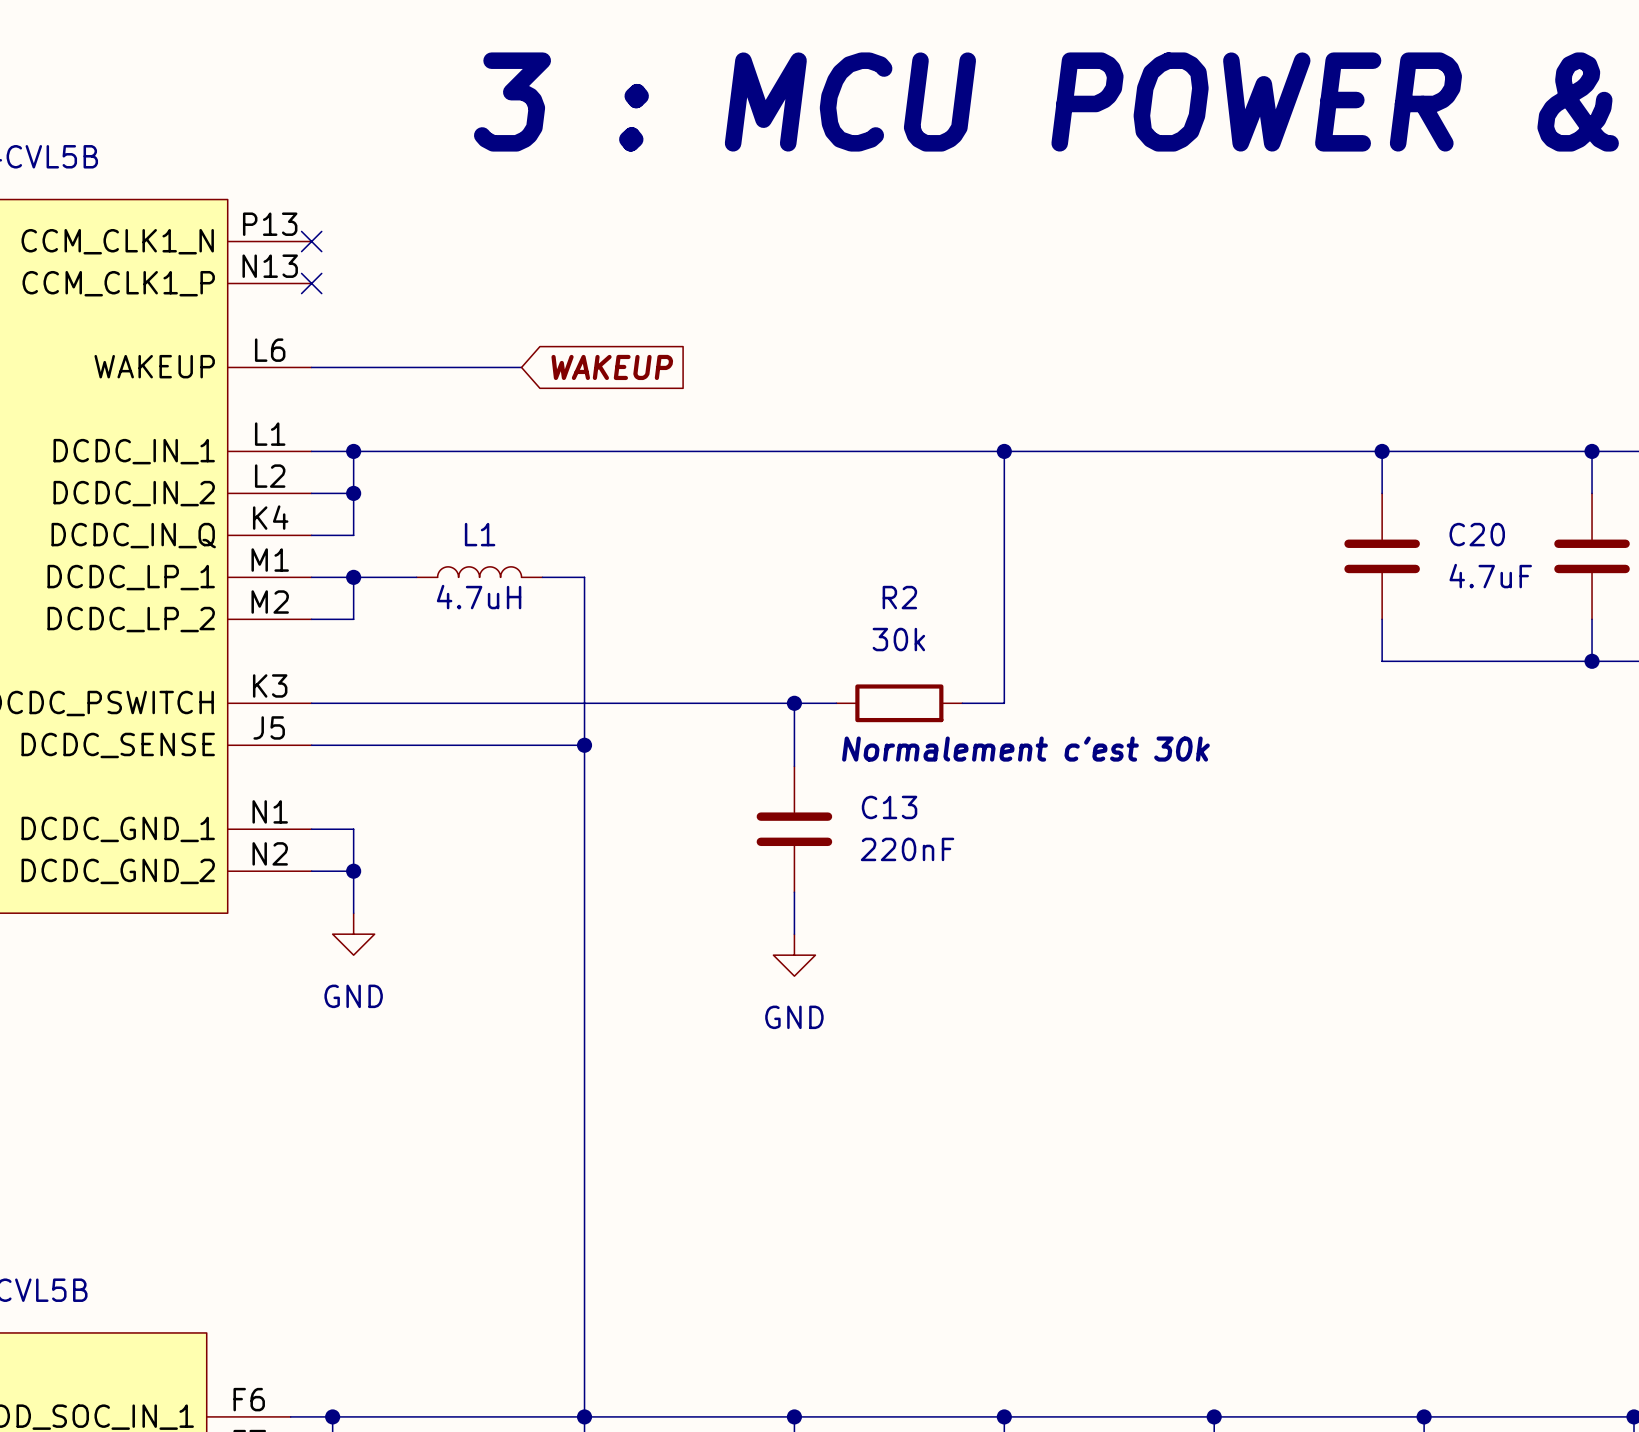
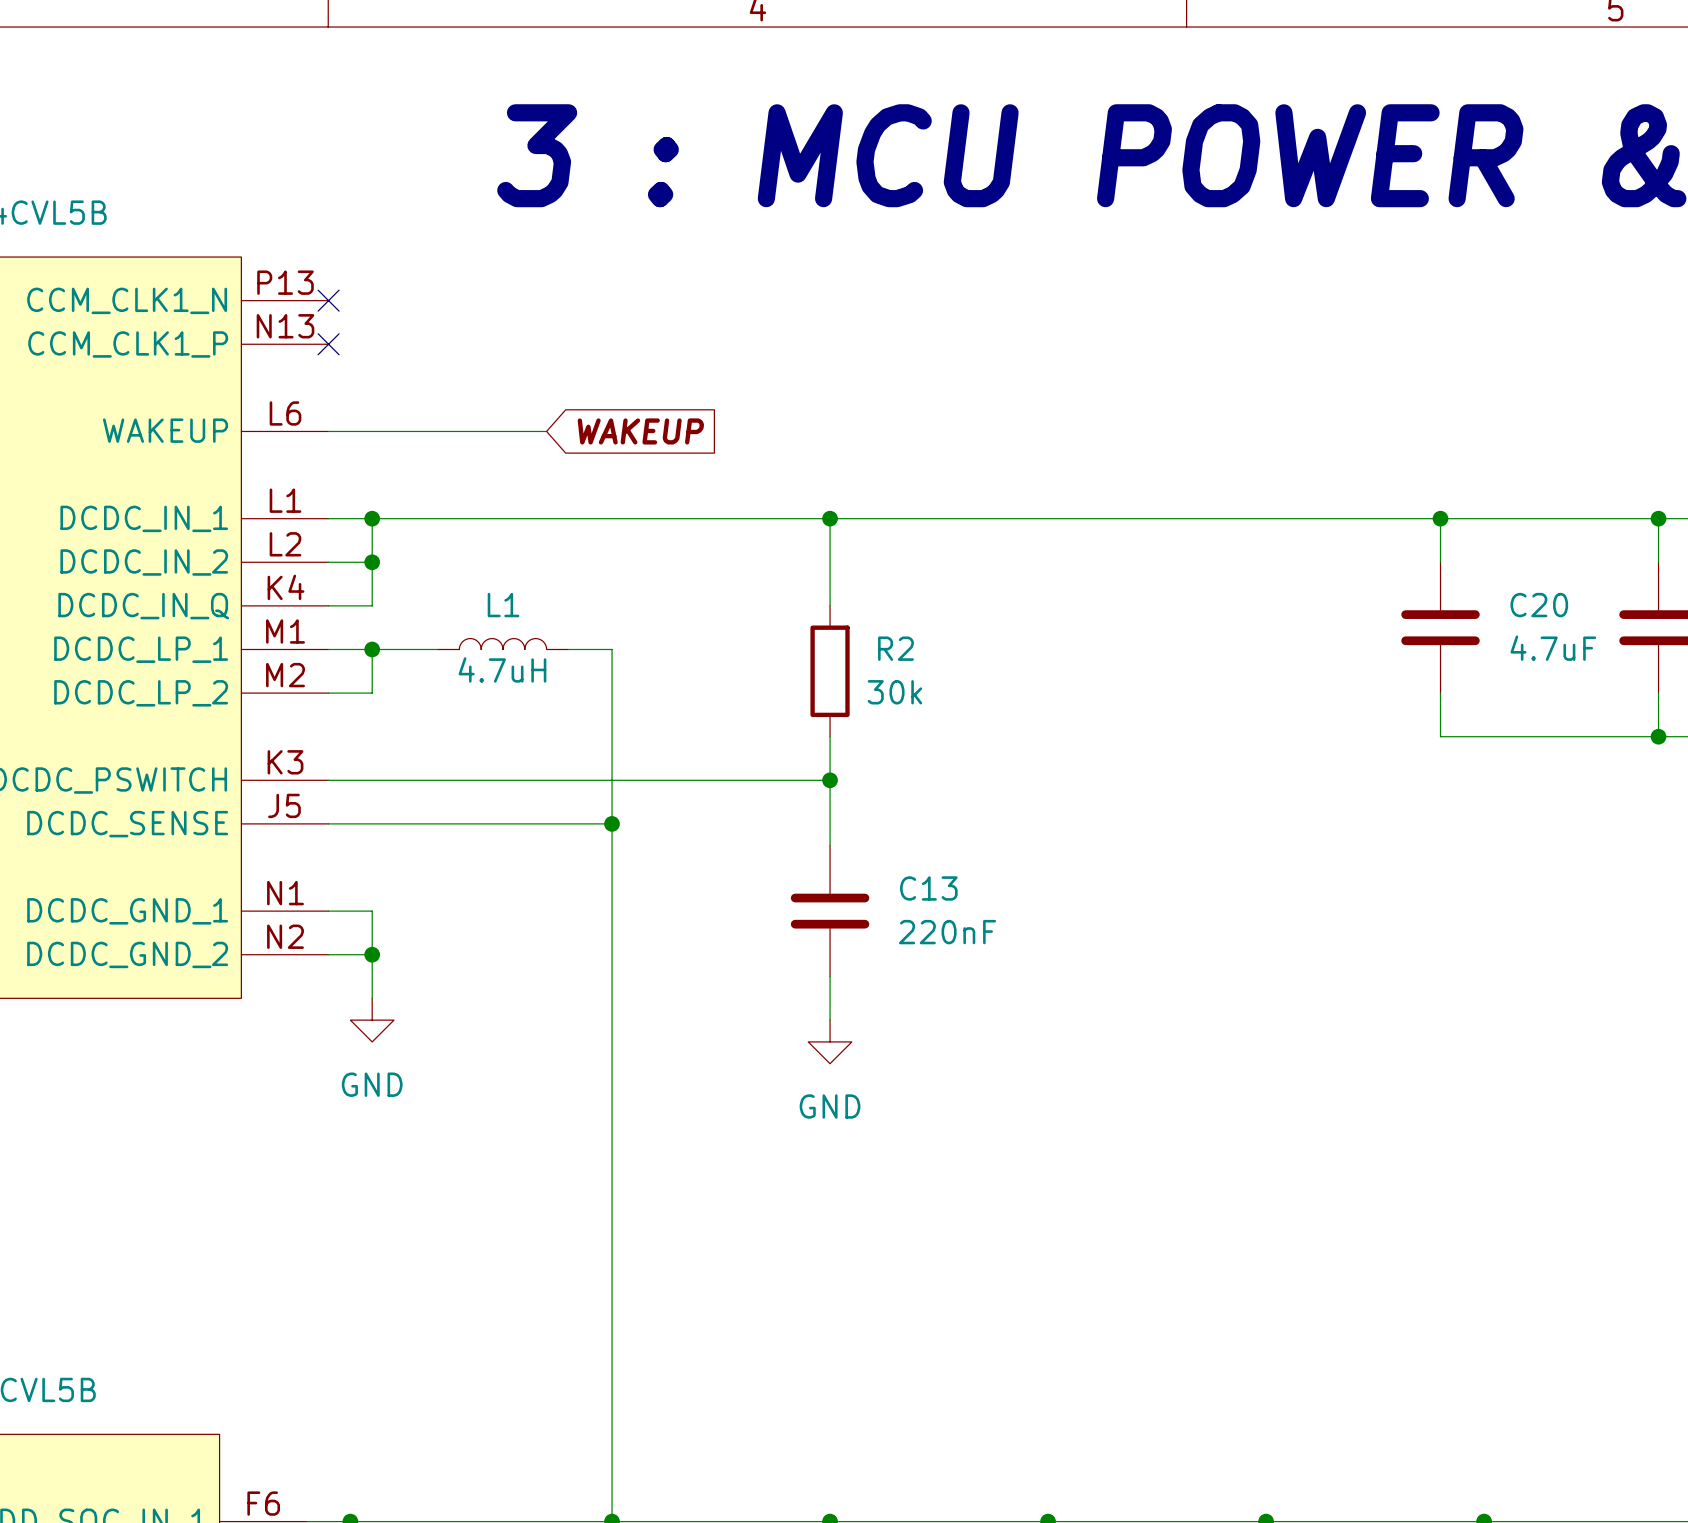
wire: none -> (830, 518) (830, 605)
junction: none -> (830, 518)
wire: (1004, 451) (1004, 703) (962, 703) -> none
junction: (1004, 451) -> none
R2 name position: R2 (899, 597) -> R2 (895, 648)
wire: (794, 703) (836, 703) -> (830, 780) (830, 736)
R2 rotation: 0° (899, 703) -> 90° clockwise (830, 671)
R2 position: (899, 703) -> (830, 671)
text: Normalement c'est 30k (1025, 749) -> none

